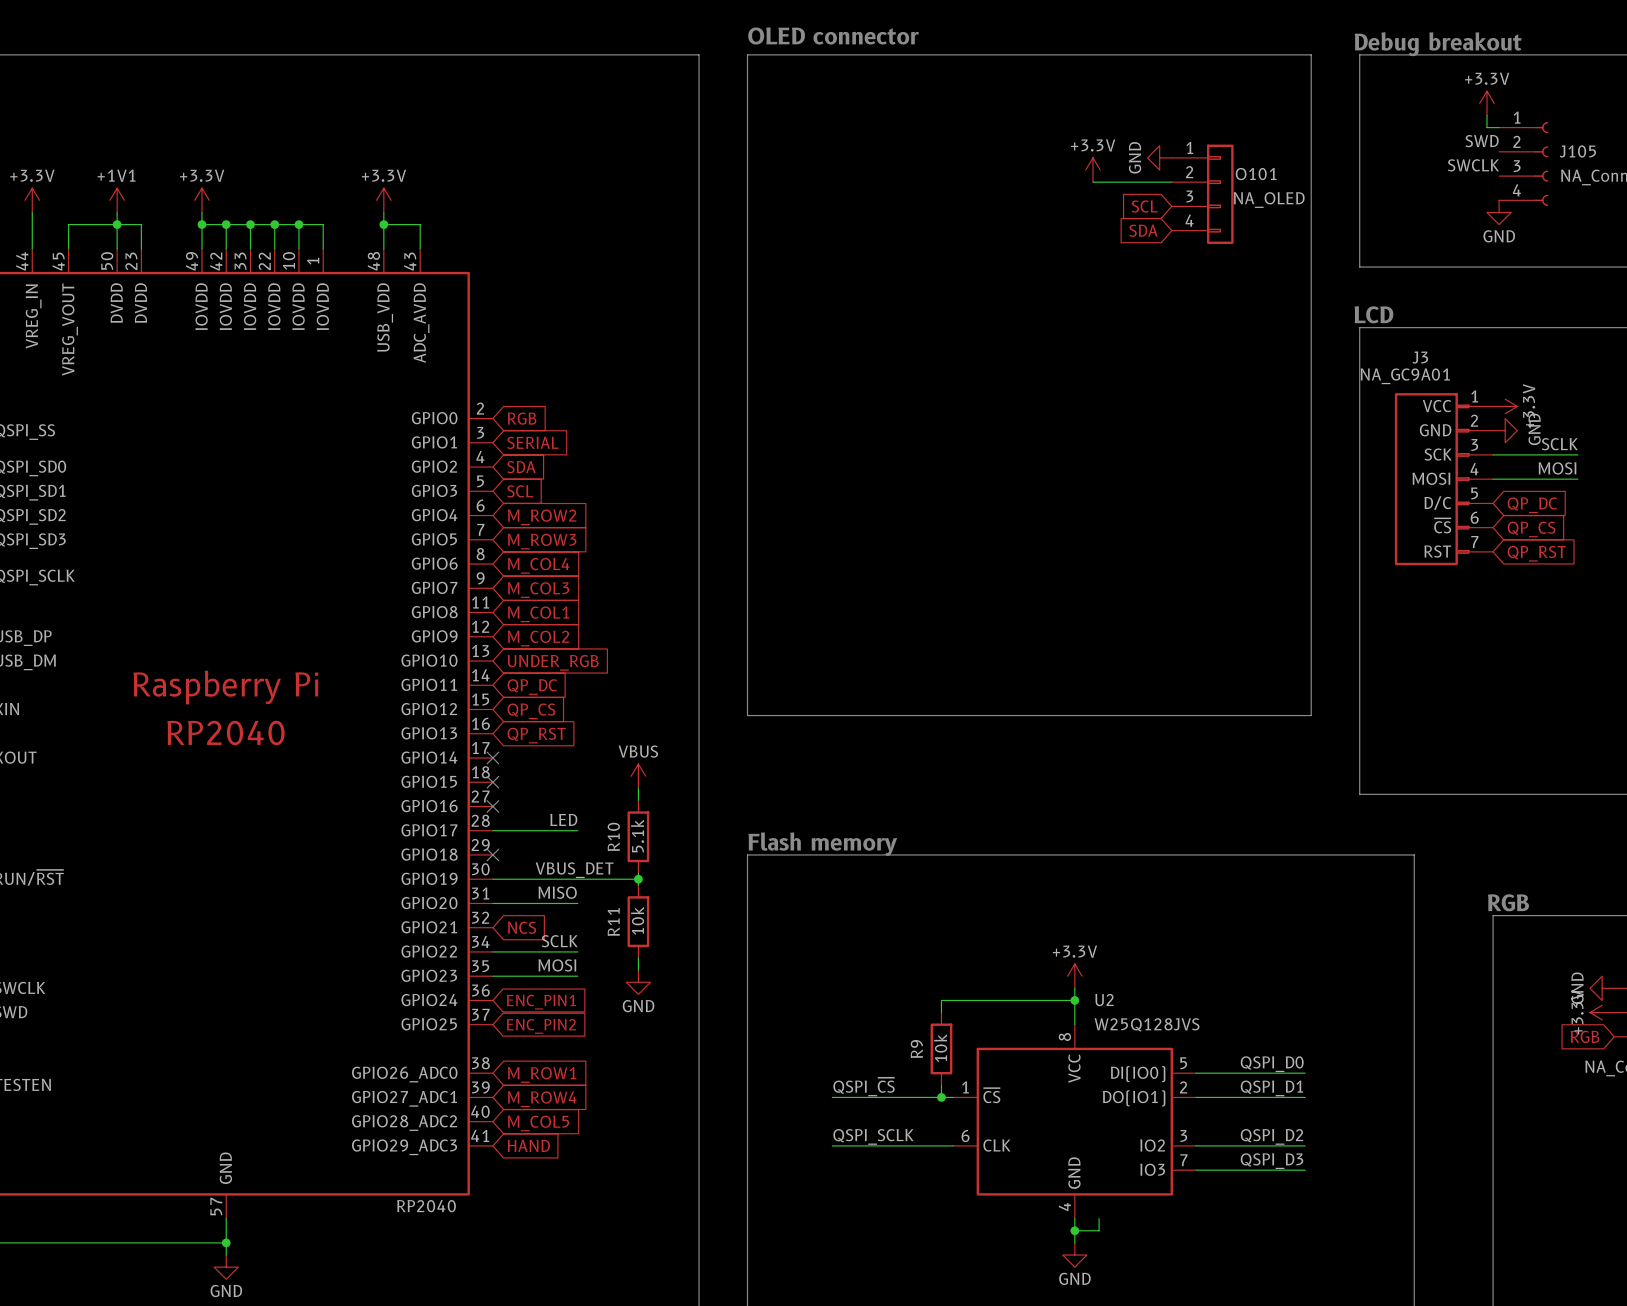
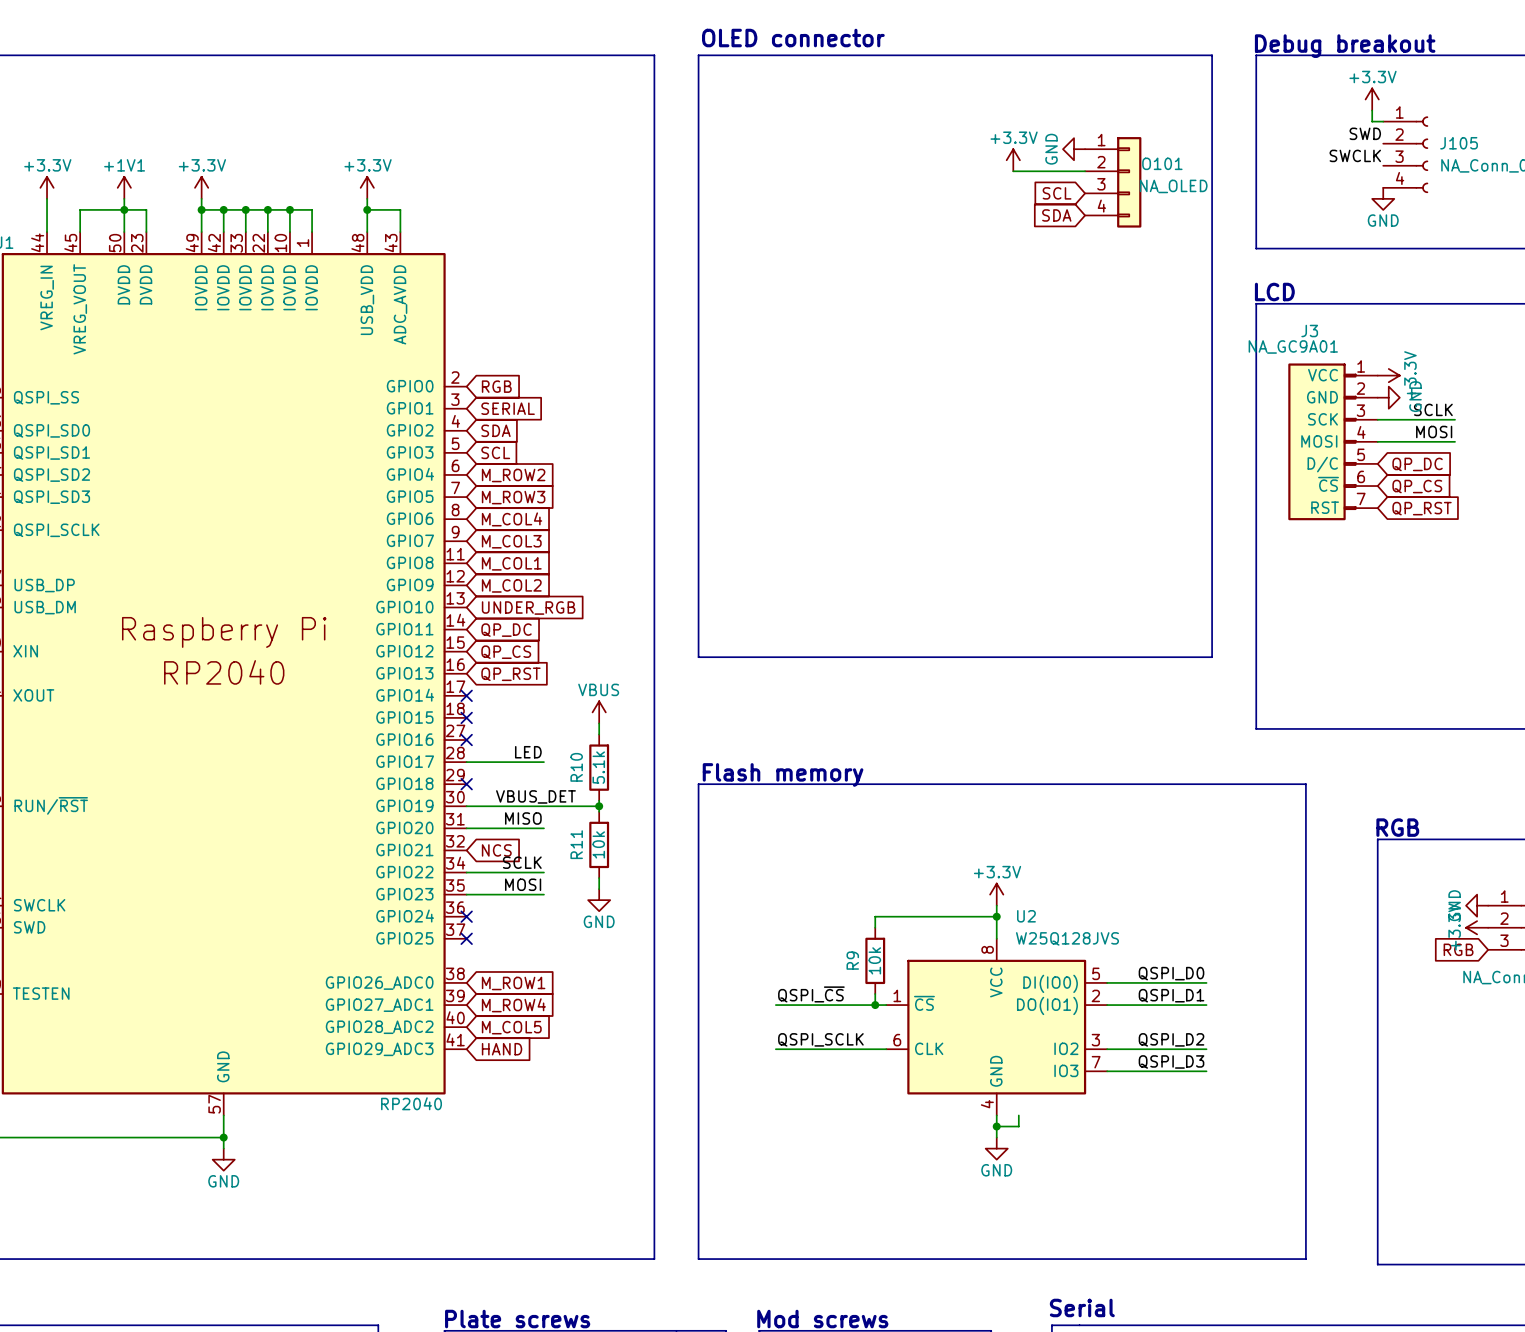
no-connect mark: none -> (466, 916)
global label: ENC_PIN1 (541, 1002) -> none
no-connect mark: none -> (466, 938)
global label: ENC_PIN2 (541, 1026) -> none

